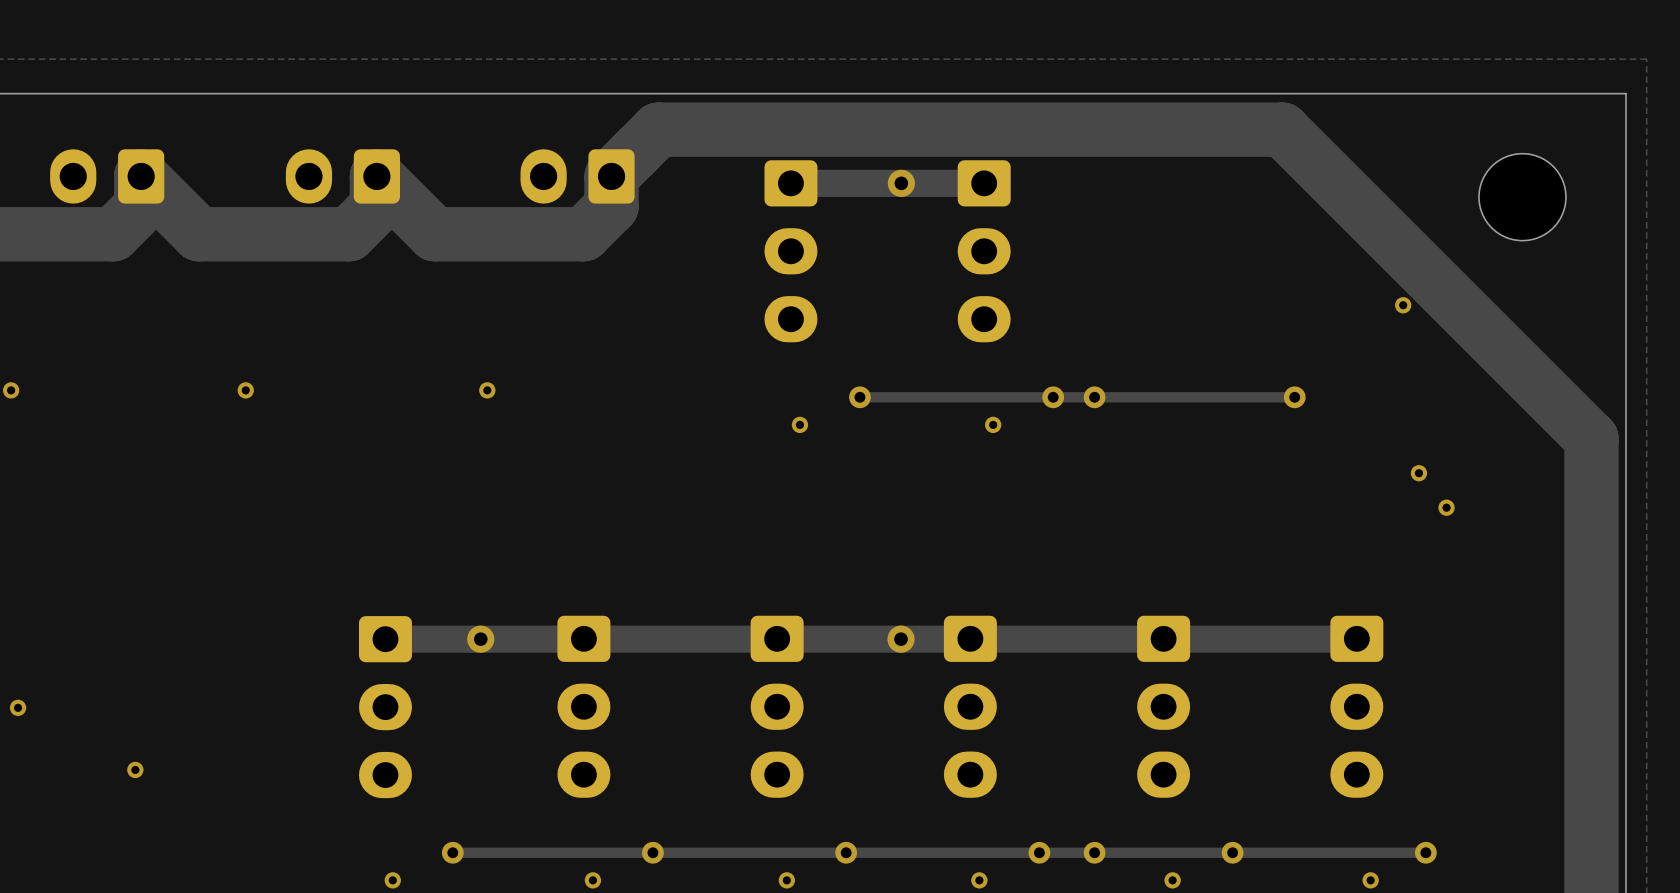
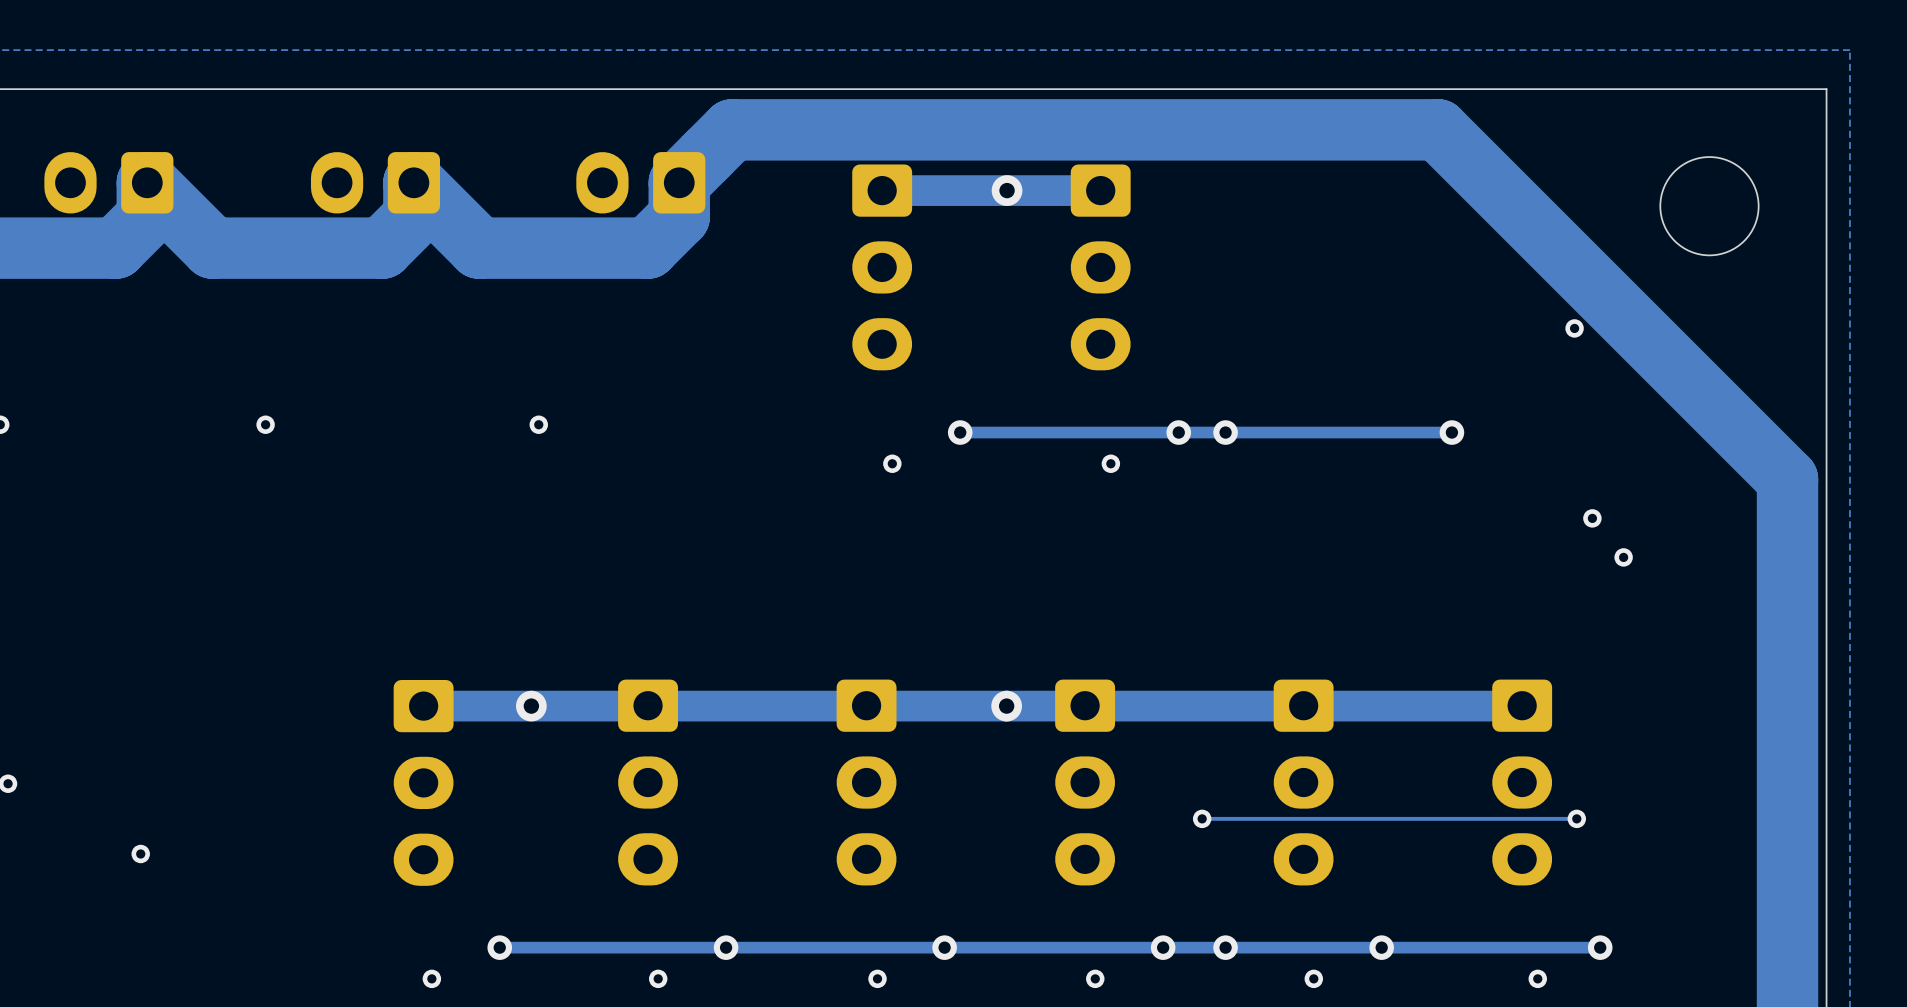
via: none -> (1202, 818)
track: none -> (1576, 818) (1202, 818)
via: none -> (1576, 818)

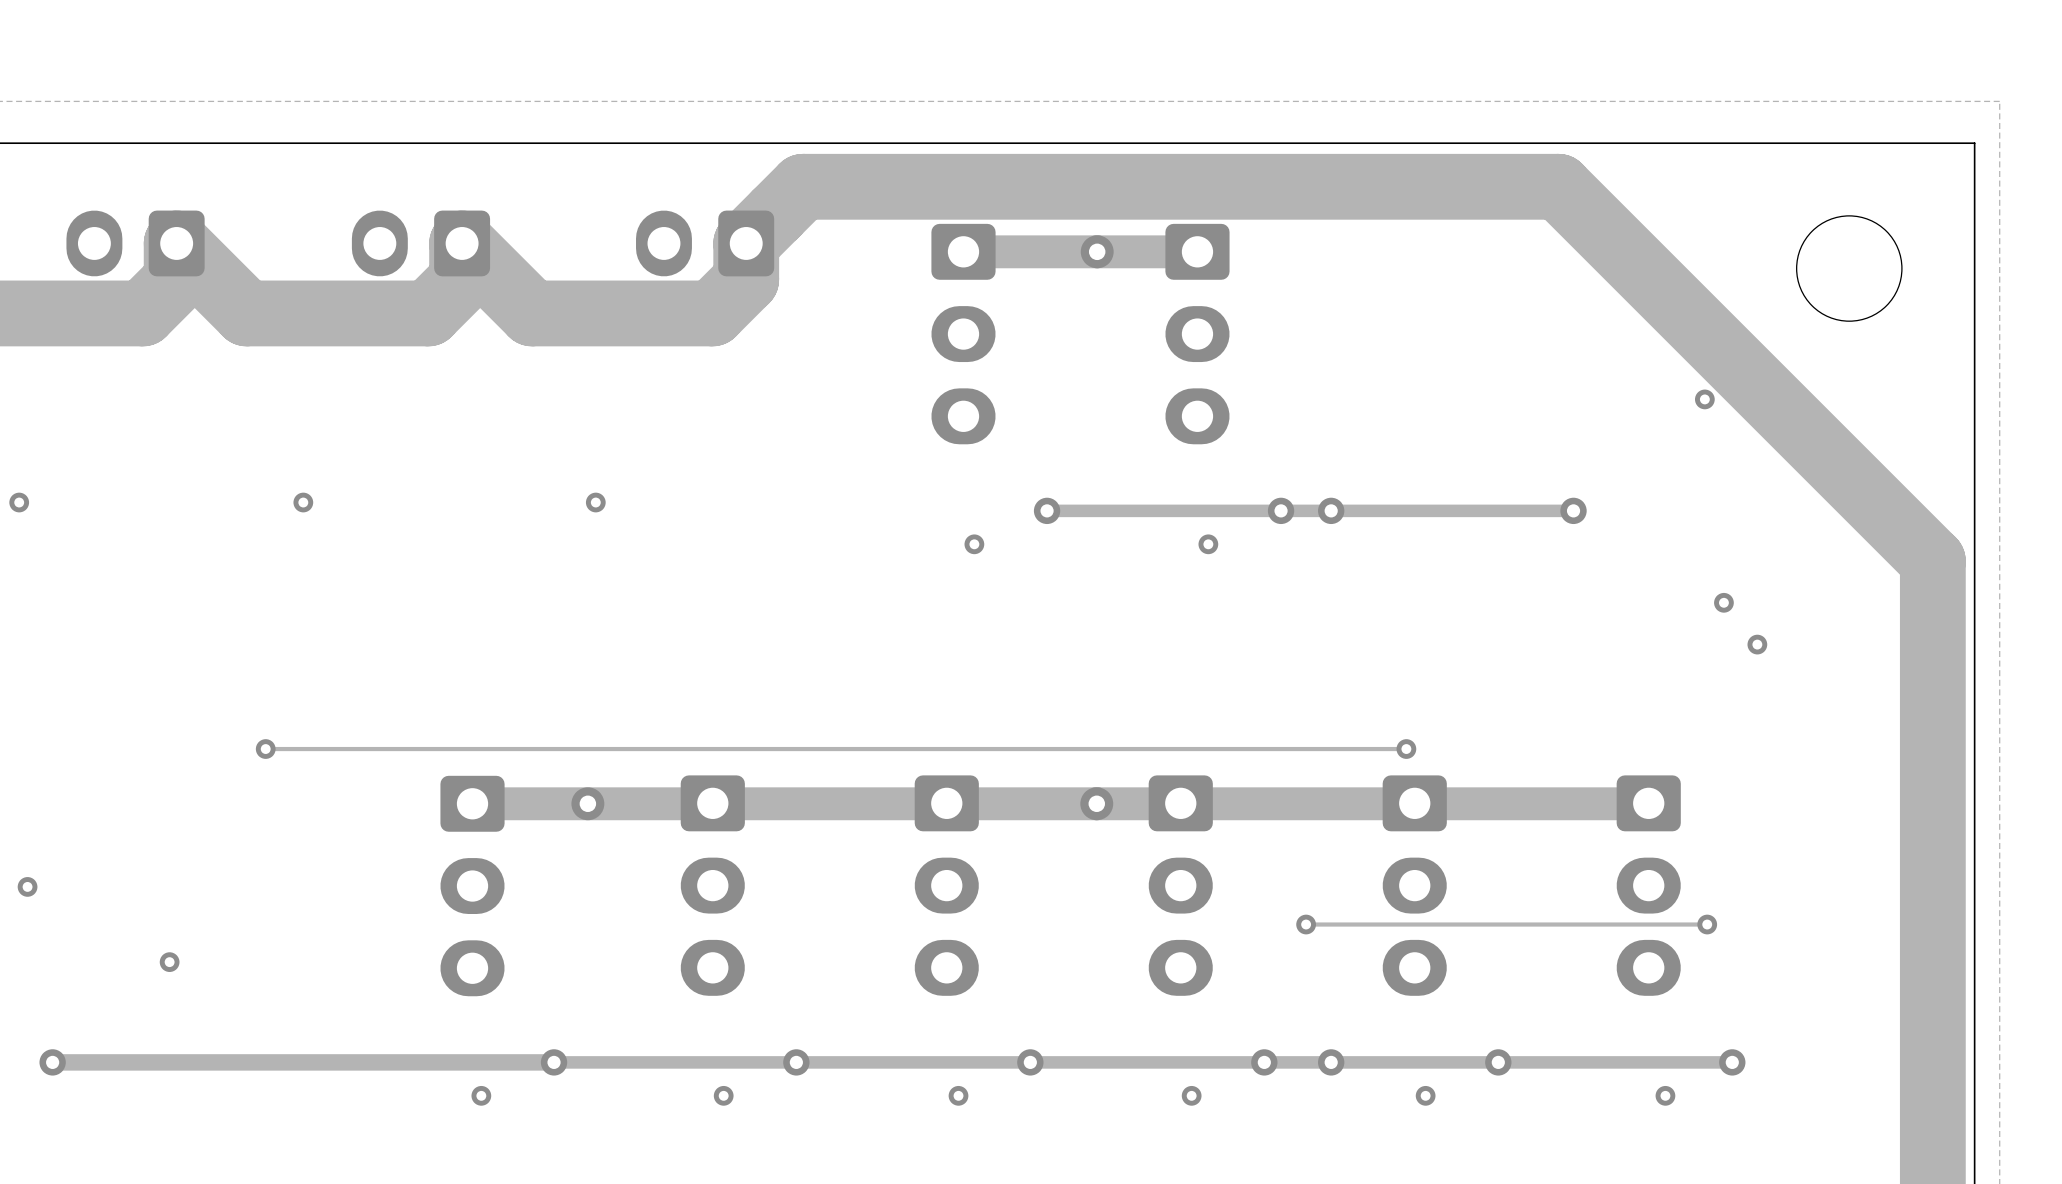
via: none -> (265, 749)
track: none -> (1406, 749) (265, 749)
via: none -> (1406, 749)
via: none -> (52, 1062)
track: none -> (554, 1062) (52, 1062)

